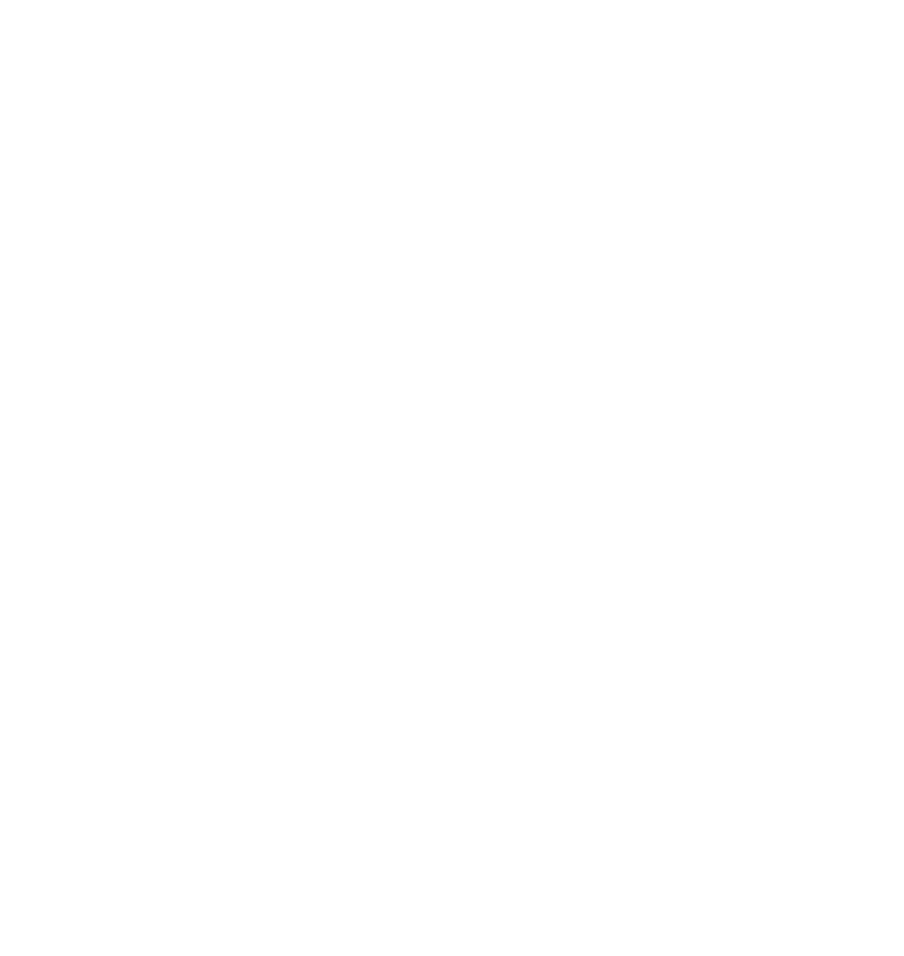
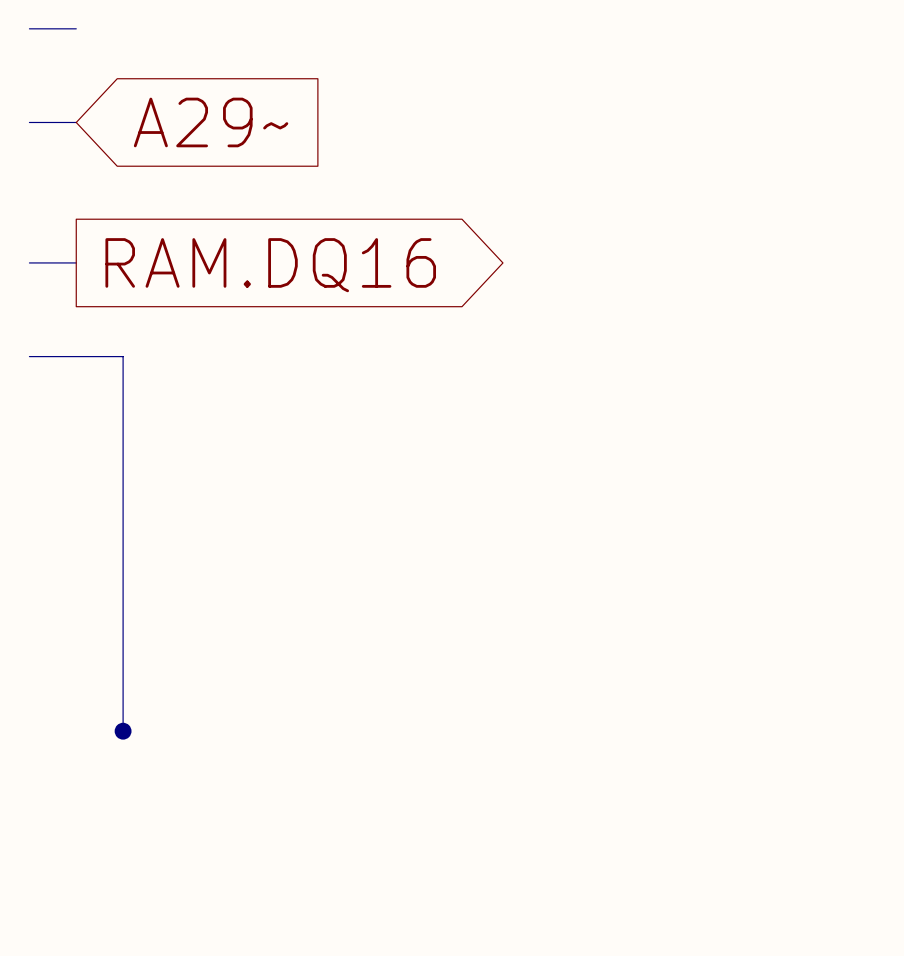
wire: none -> (29, 28) (76, 28)
wire: none -> (29, 122) (76, 122)
global label: none -> A29~ (211, 122)
wire: none -> (29, 262) (76, 262)
global label: none -> RAM.DQ16 (270, 265)
wire: none -> (29, 356) (123, 356) (123, 731)
junction: none -> (123, 731)

